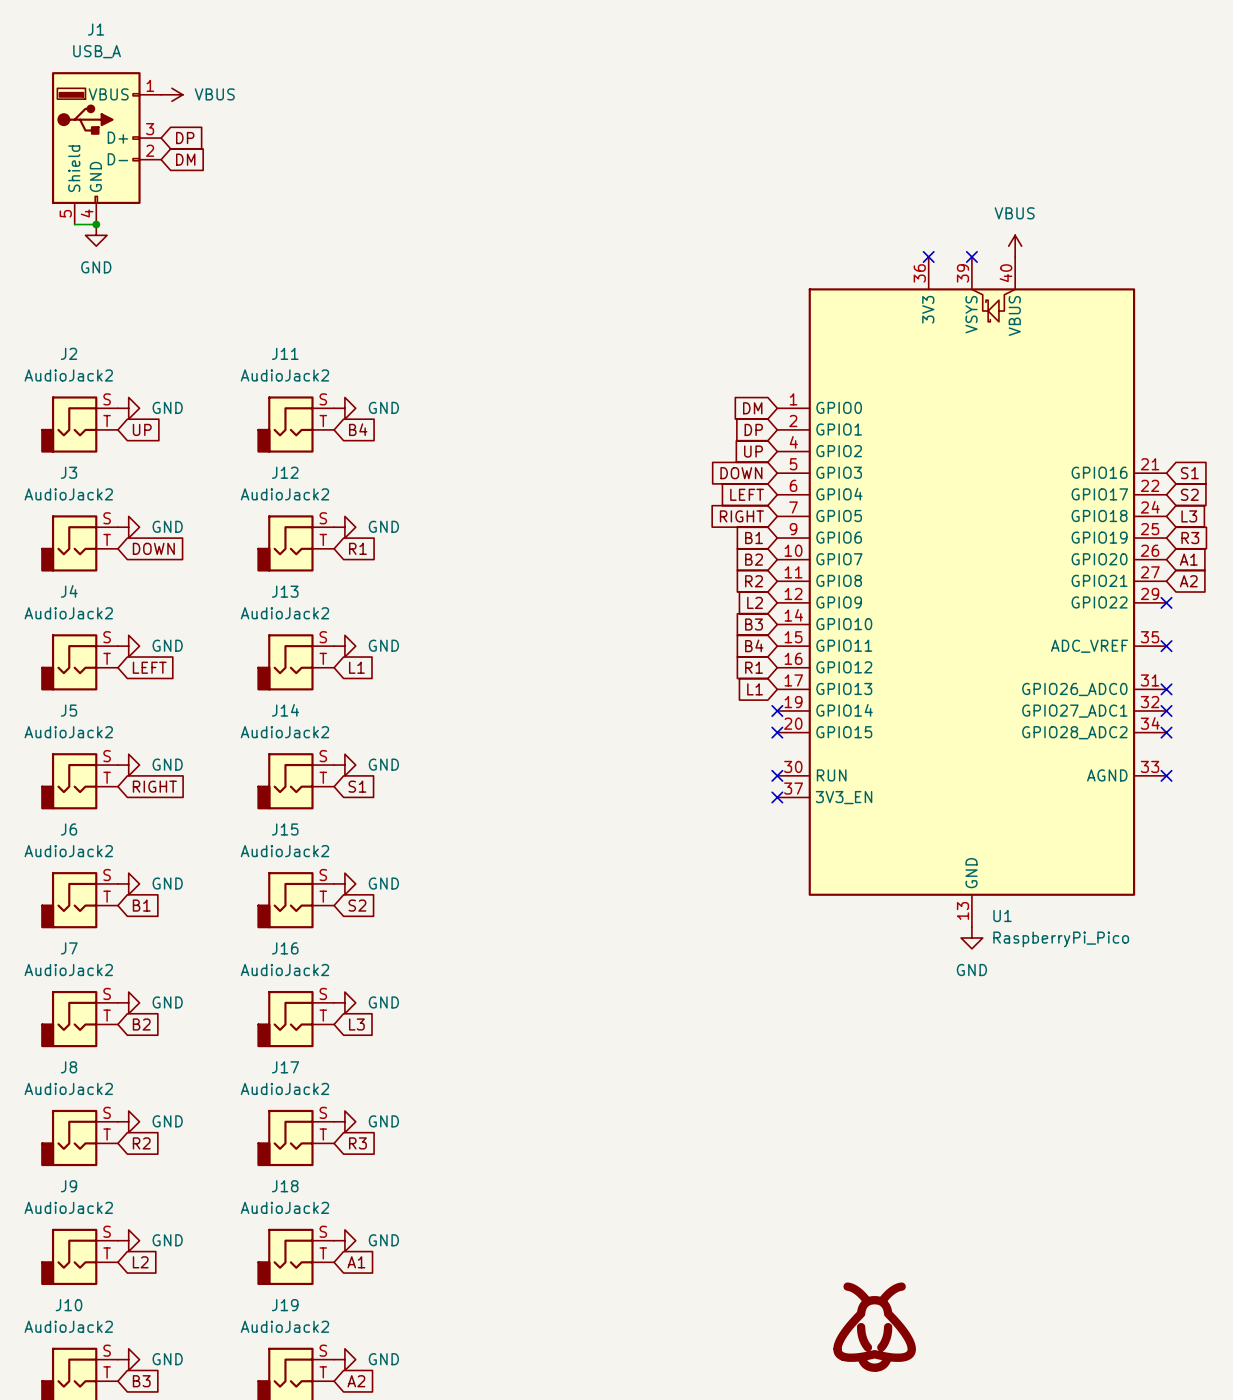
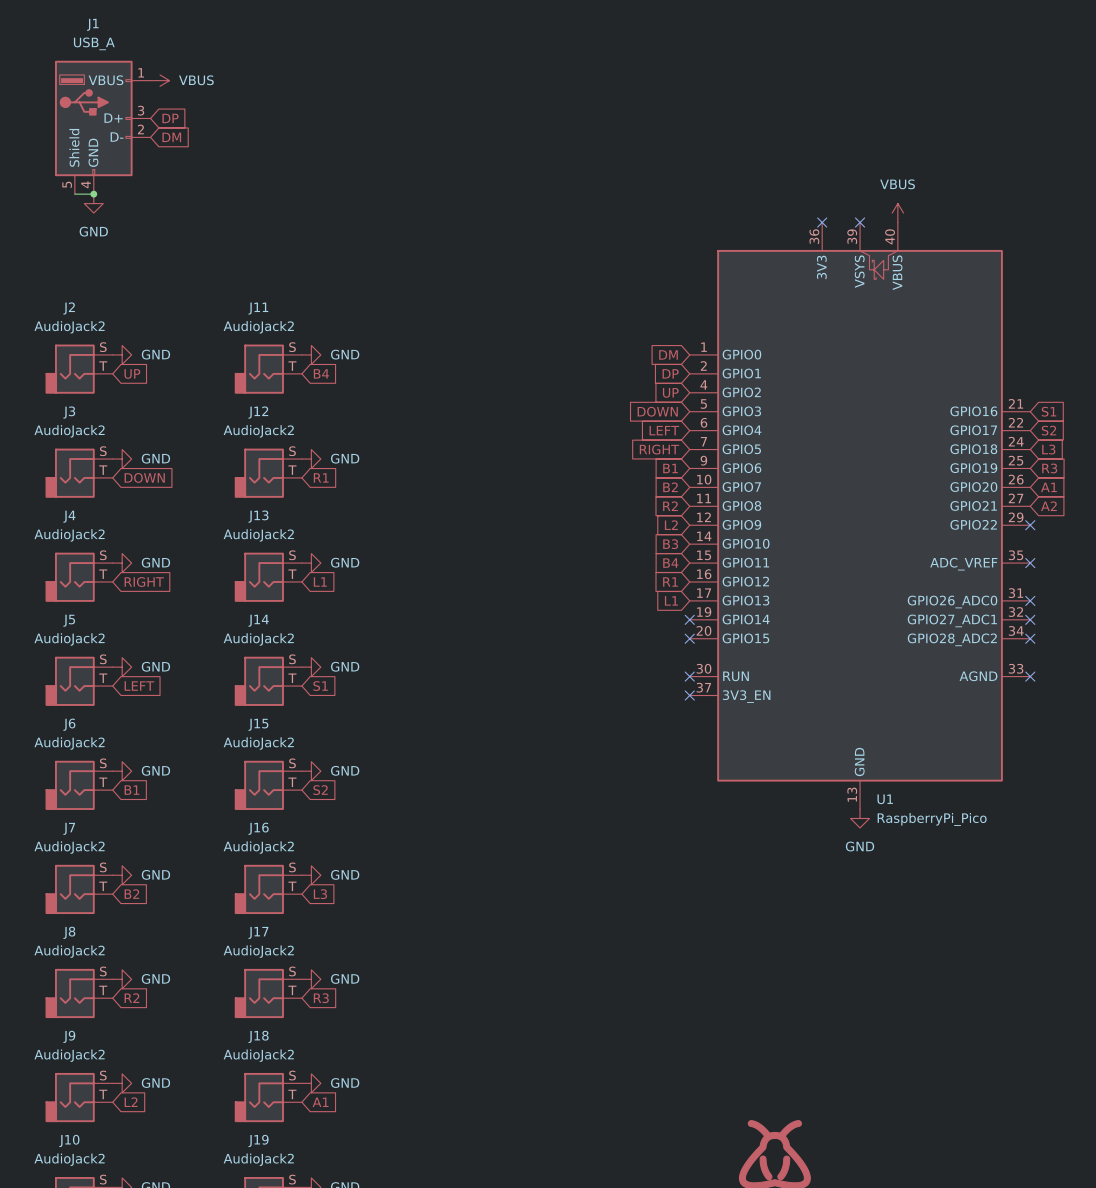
global label: LEFT (149, 667) -> RIGHT (144, 581)
global label: RIGHT (154, 786) -> LEFT (139, 686)

